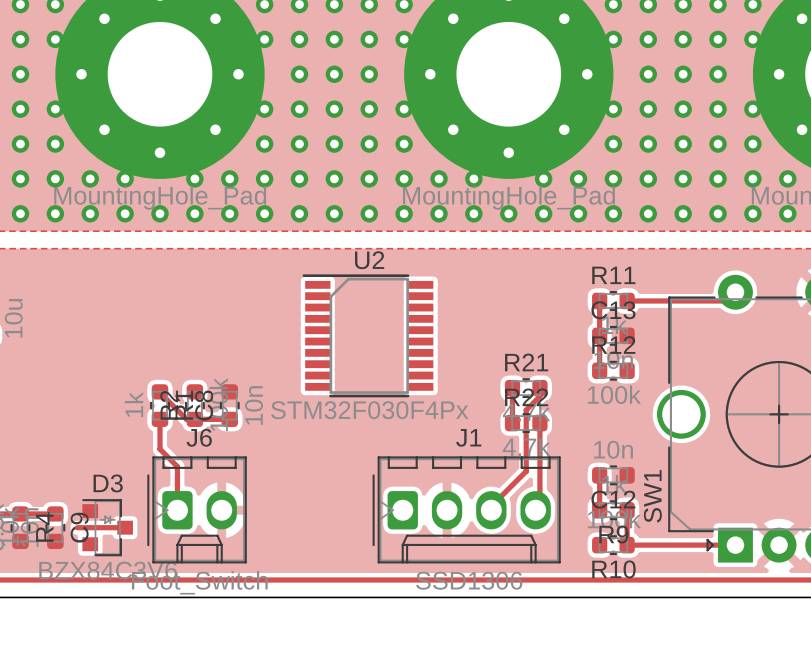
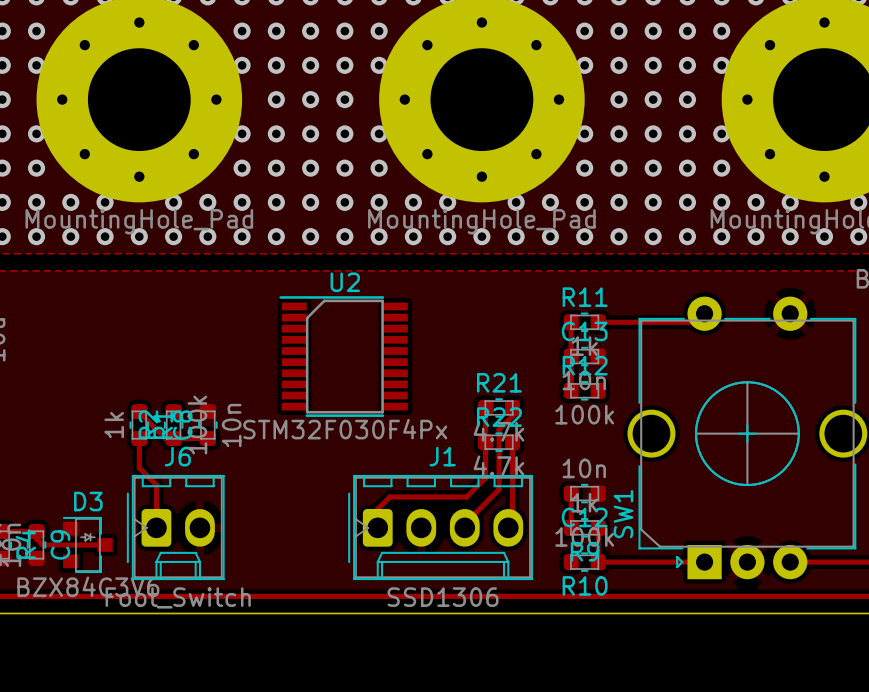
track: none -> (485, 442) (485, 477) (466, 497) (389, 497) (377, 509) (377, 527)
track: none -> (36, 531) (36, 538) (42, 544) (58, 544)

